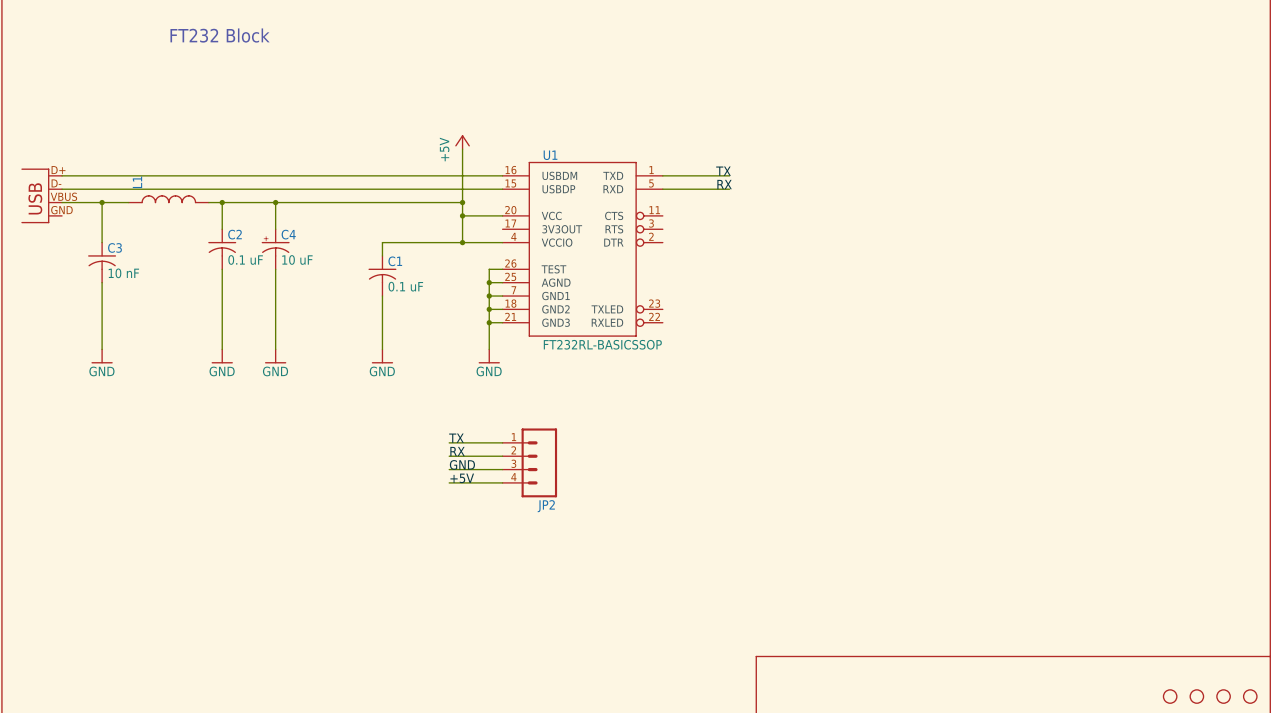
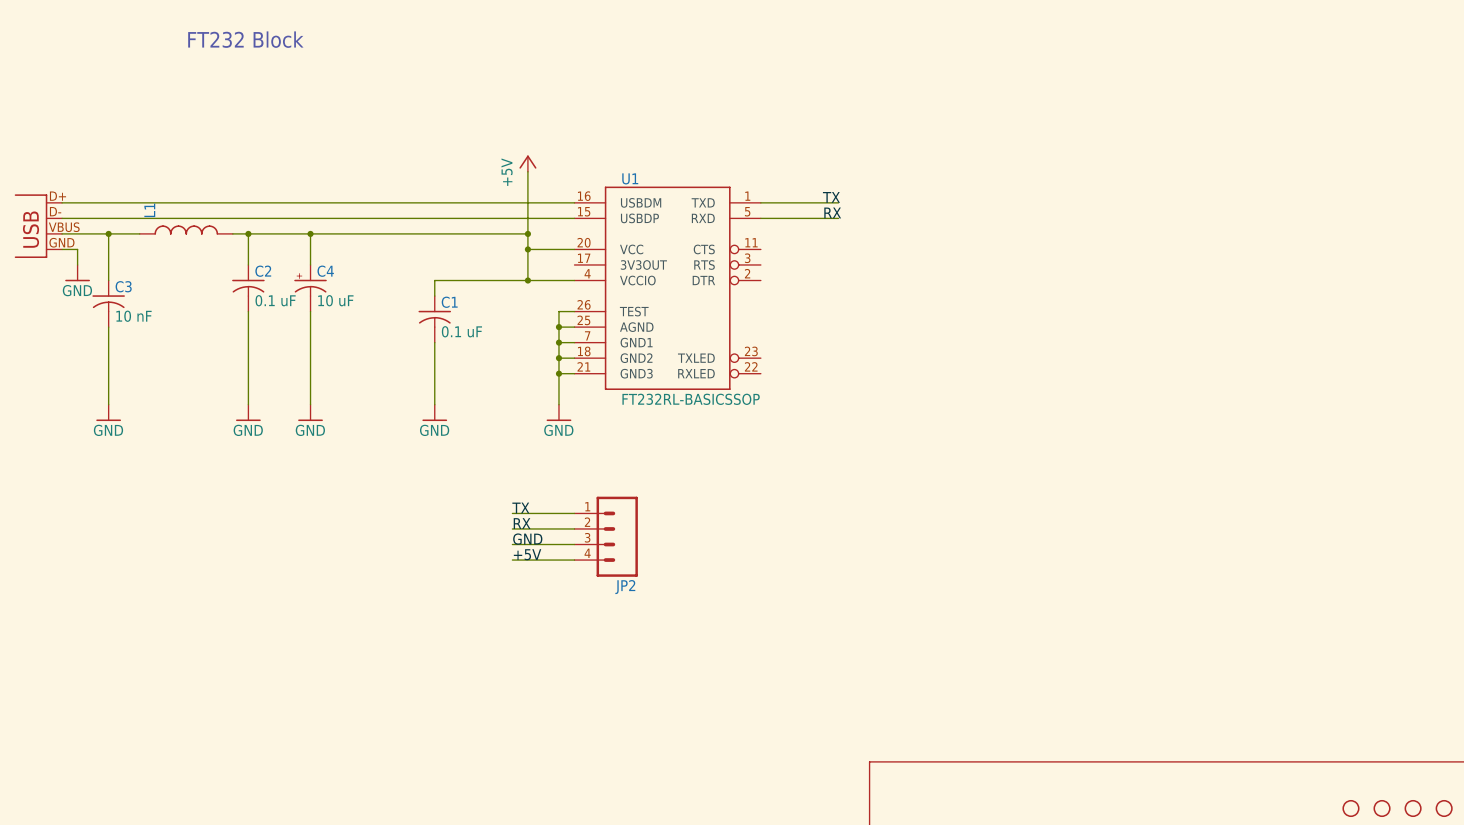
wire: none -> (62, 249) (77, 249) (77, 264)
power symbol: none -> GND (77, 273)

